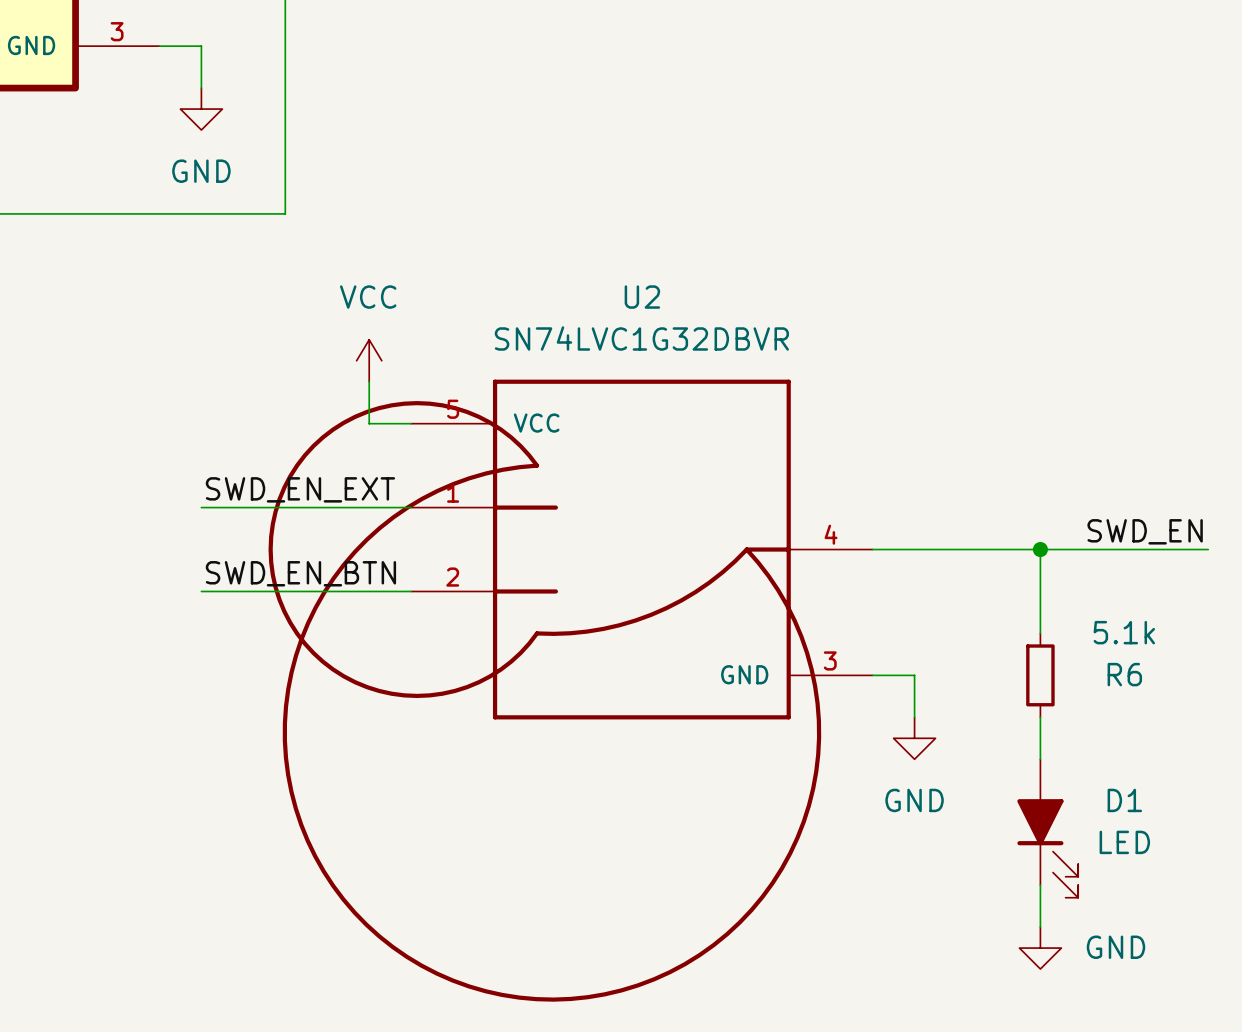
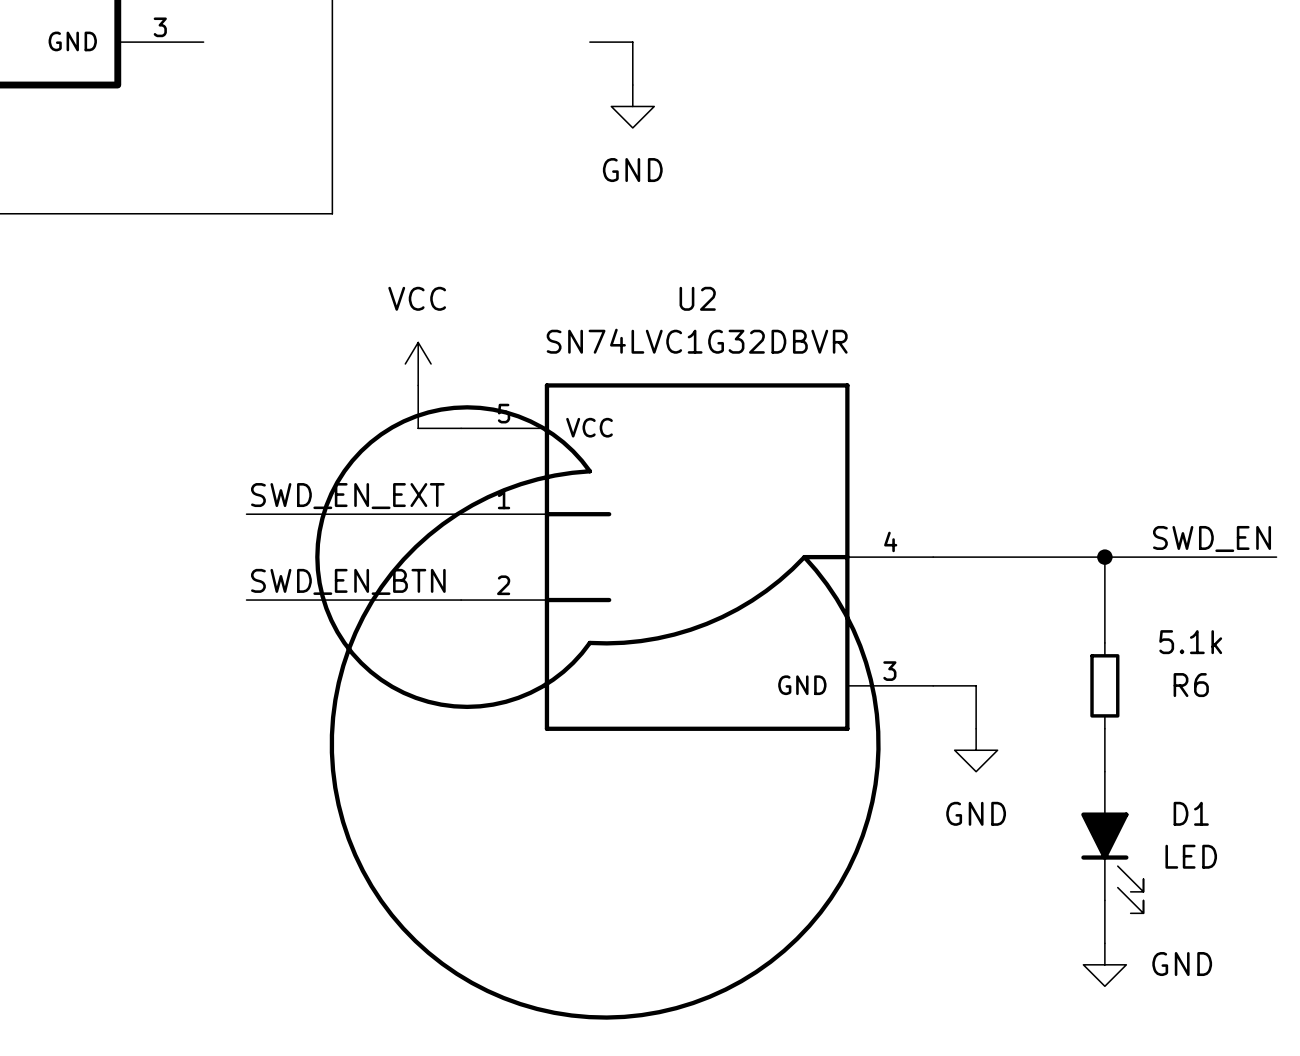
wire: (159, 46) (201, 46) (201, 88) -> (589, 42) (632, 42) (632, 85)
power symbol: GND (201, 109) -> none
power symbol: none -> GND (632, 106)

